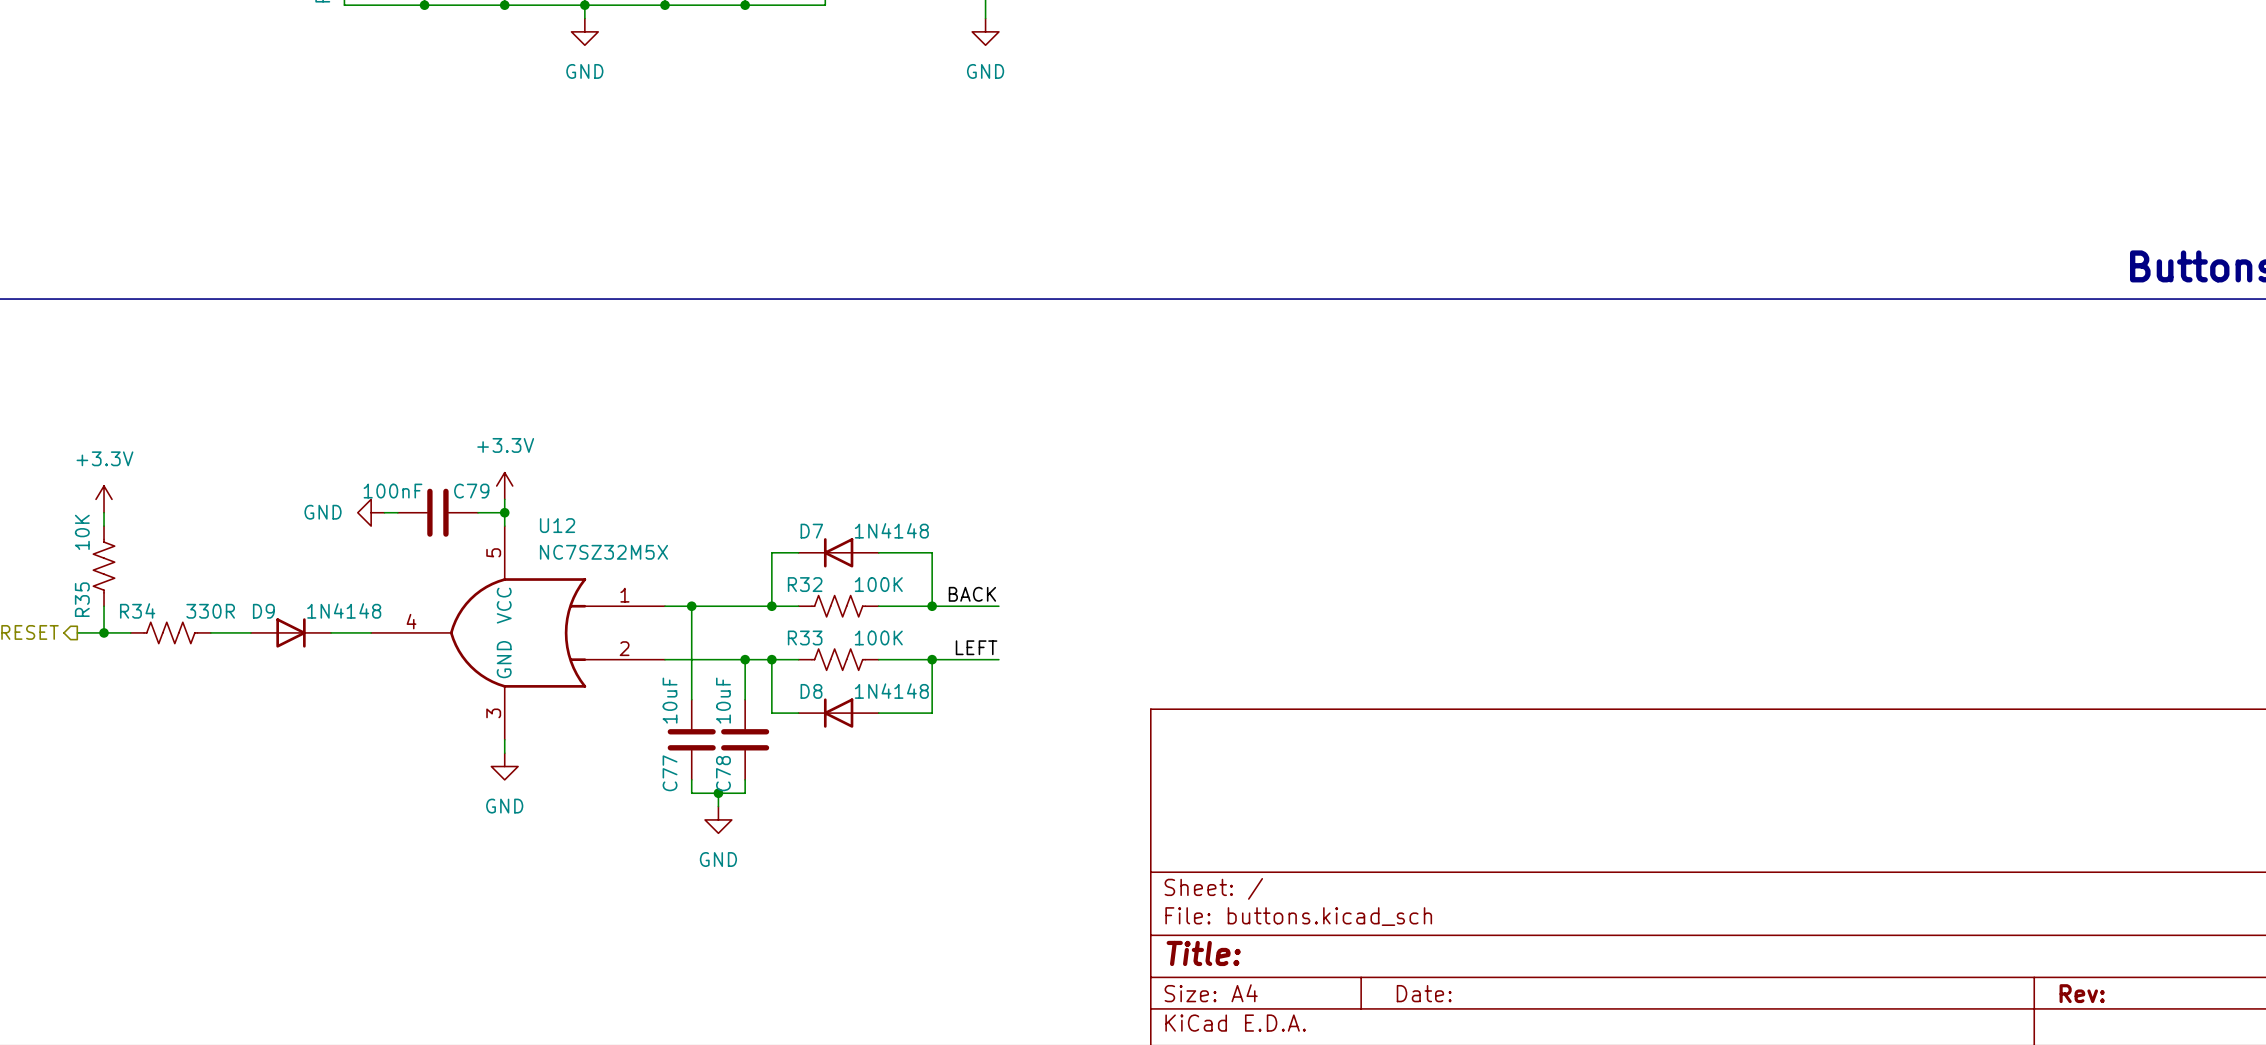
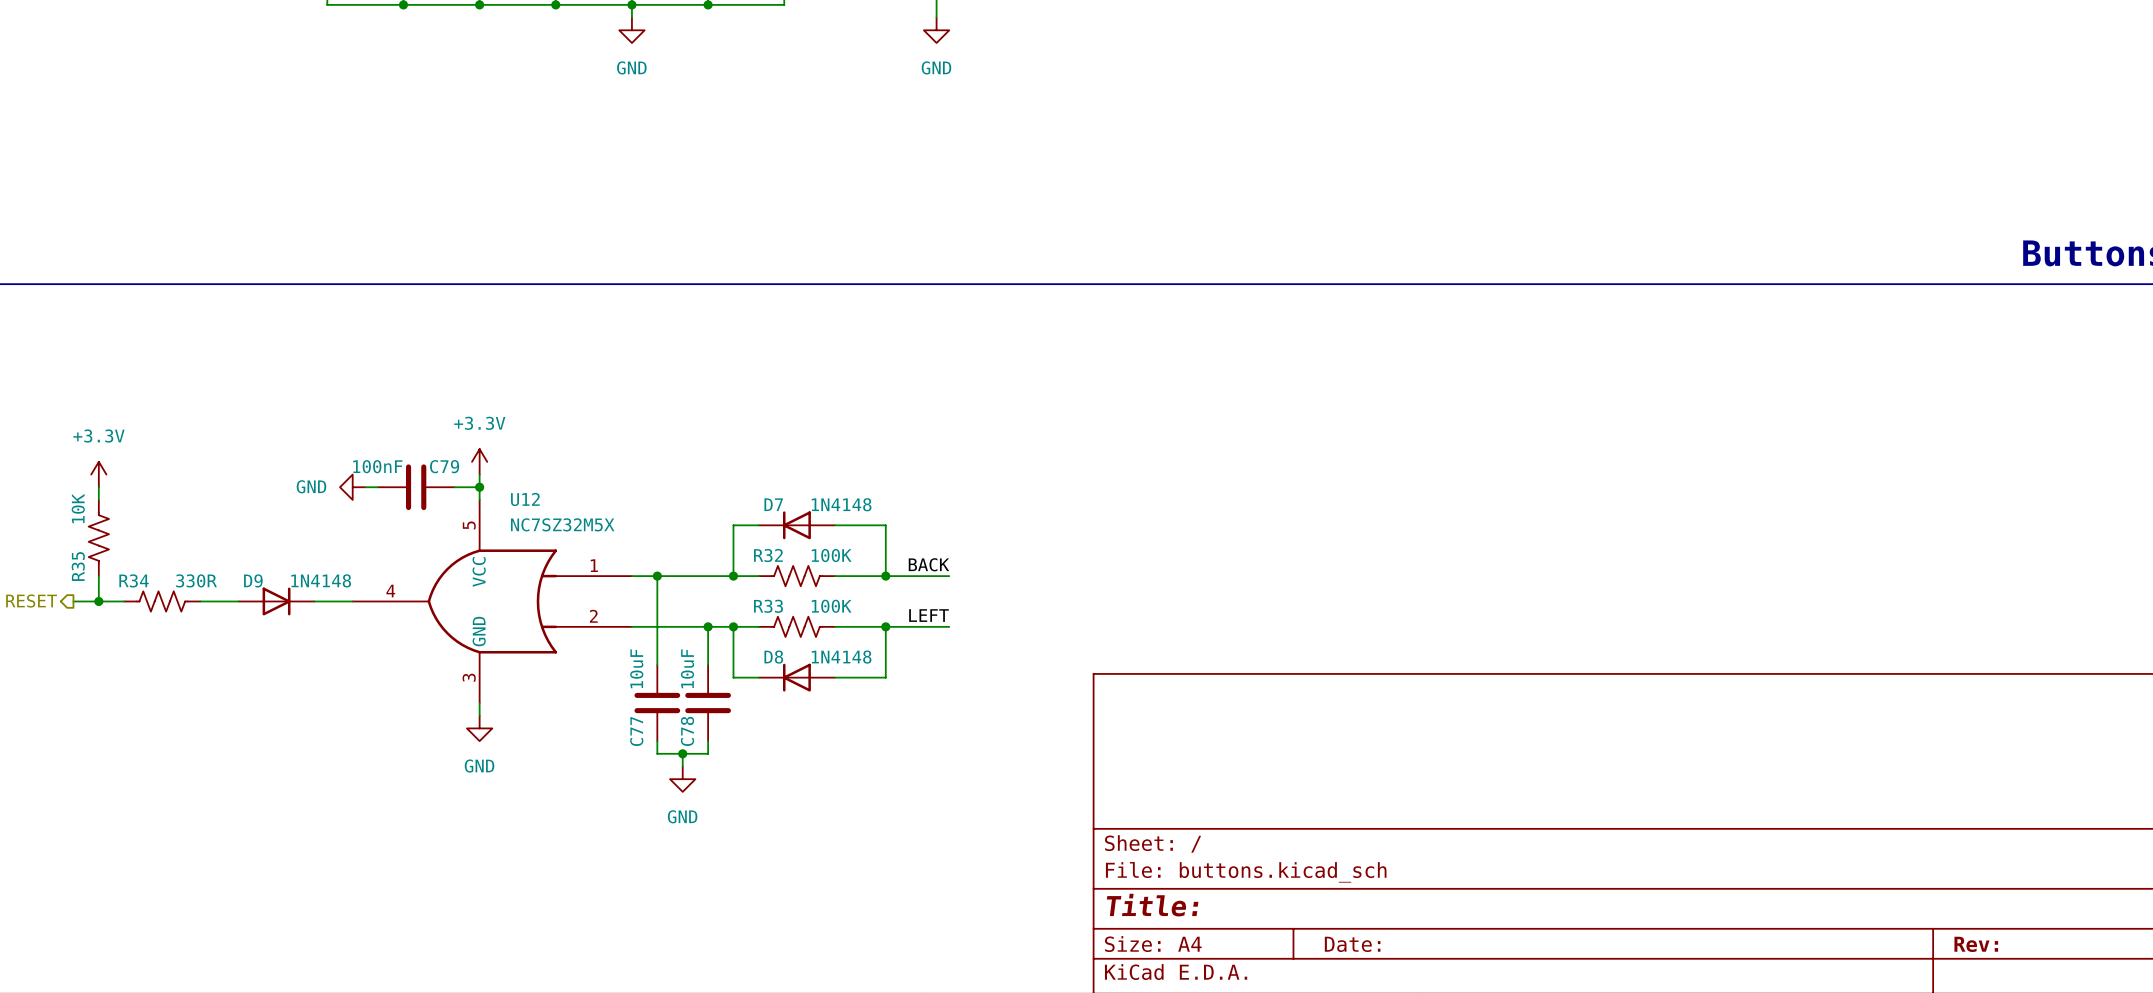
wire: (584, 5) (584, 18) -> (631, 4) (631, 17)
power symbol position: GND (584, 31) -> GND (631, 30)

